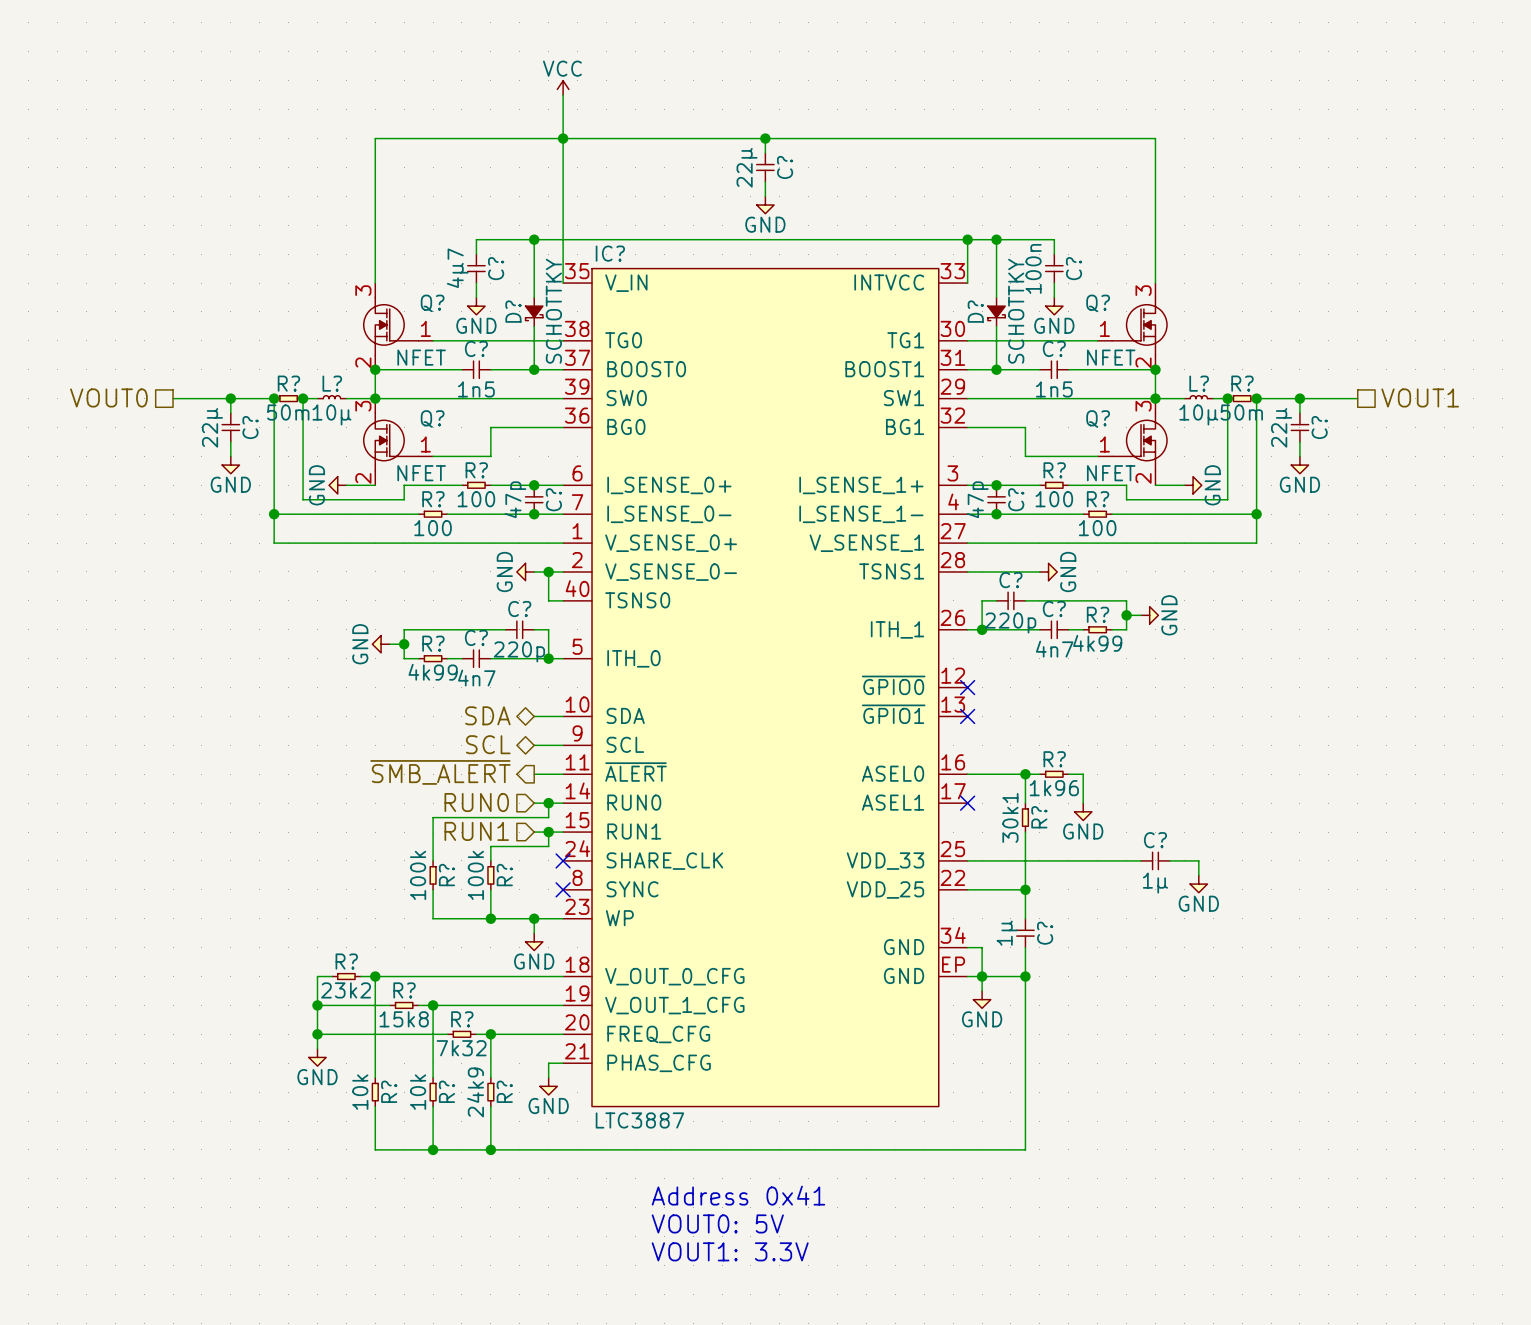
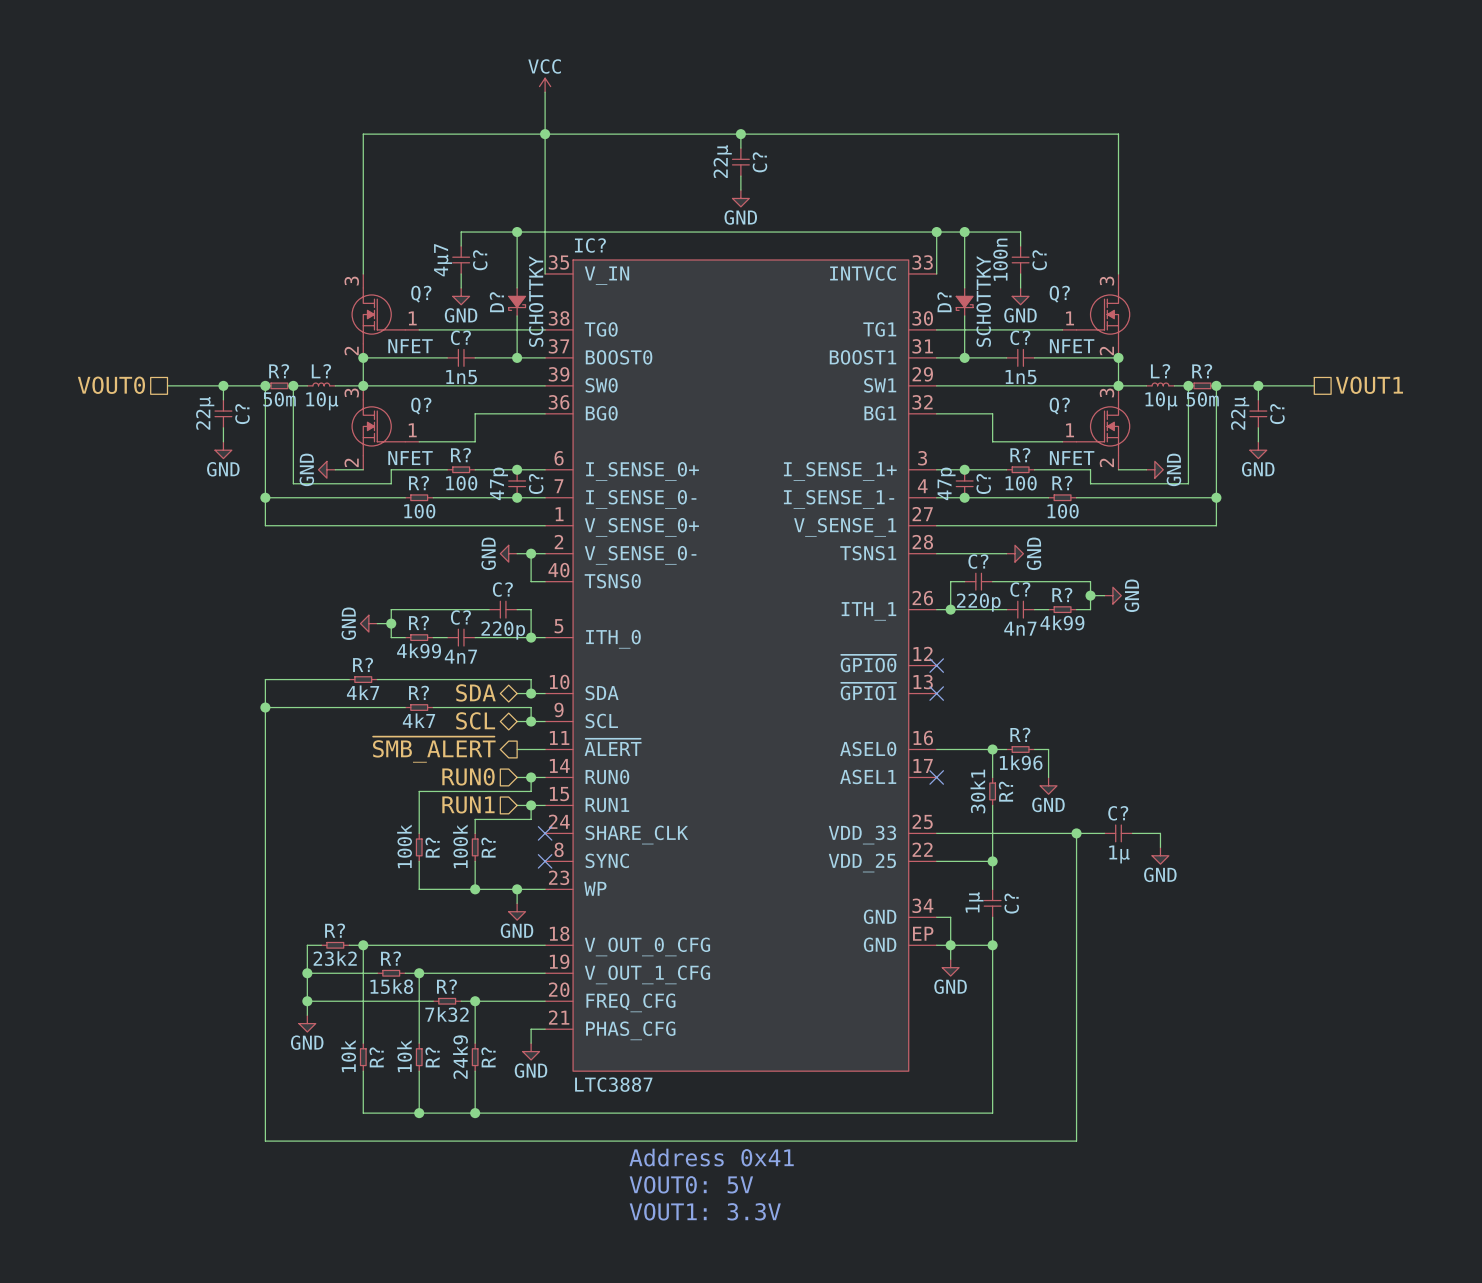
wire: none -> (349, 679) (265, 679) (265, 1141) (1076, 1141) (1076, 833)
R?: none -> 4k7 (363, 679)
wire: none -> (377, 679) (531, 679) (531, 693)
junction: none -> (531, 693)
wire: none -> (265, 707) (405, 707)
junction: none -> (265, 707)
R?: none -> 4k7 (419, 707)
wire: none -> (433, 707) (531, 707) (531, 721)
junction: none -> (531, 721)
junction: none -> (1076, 833)

